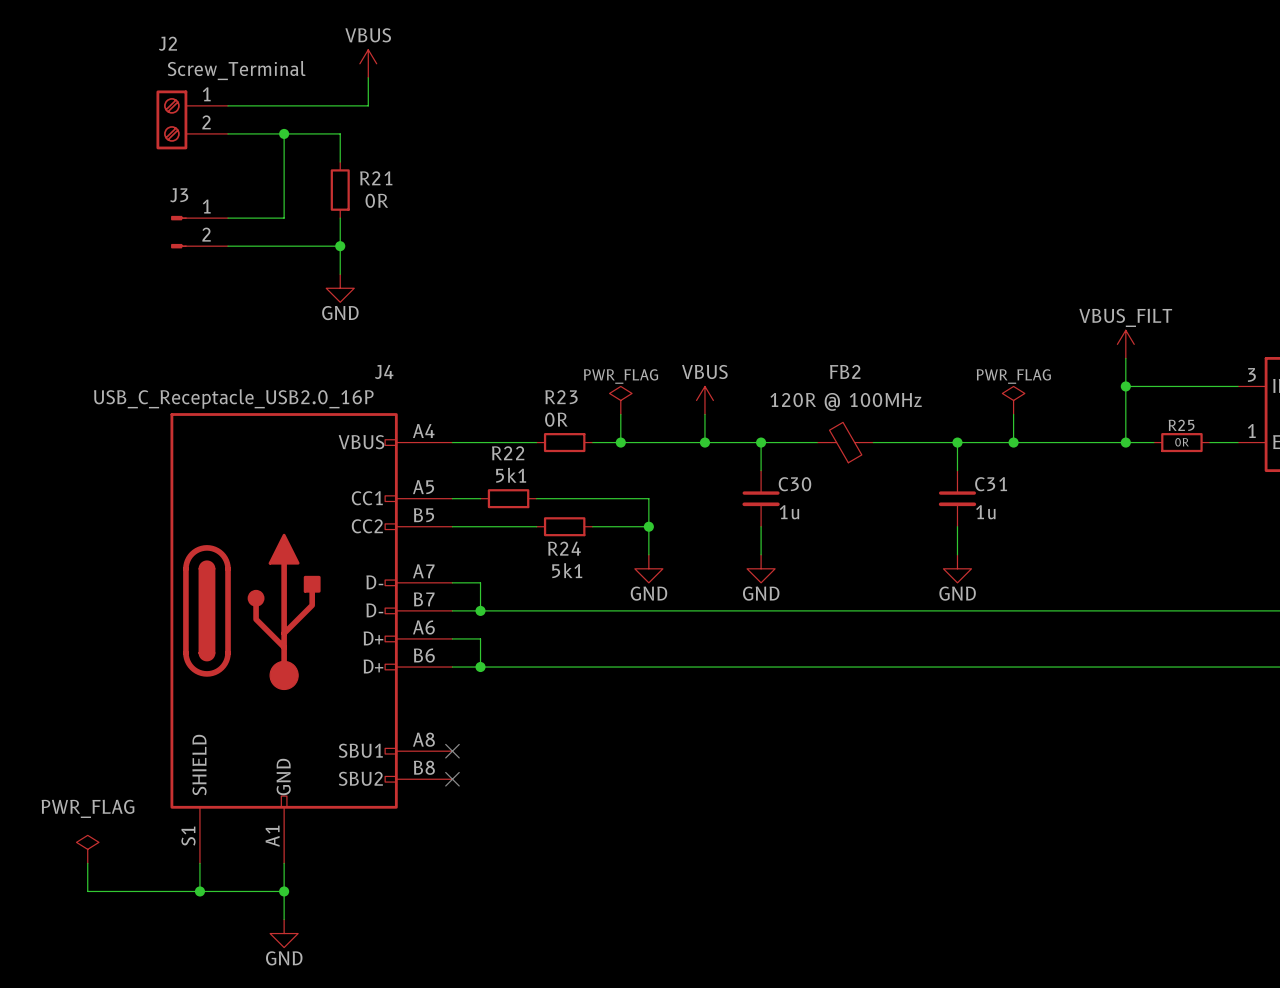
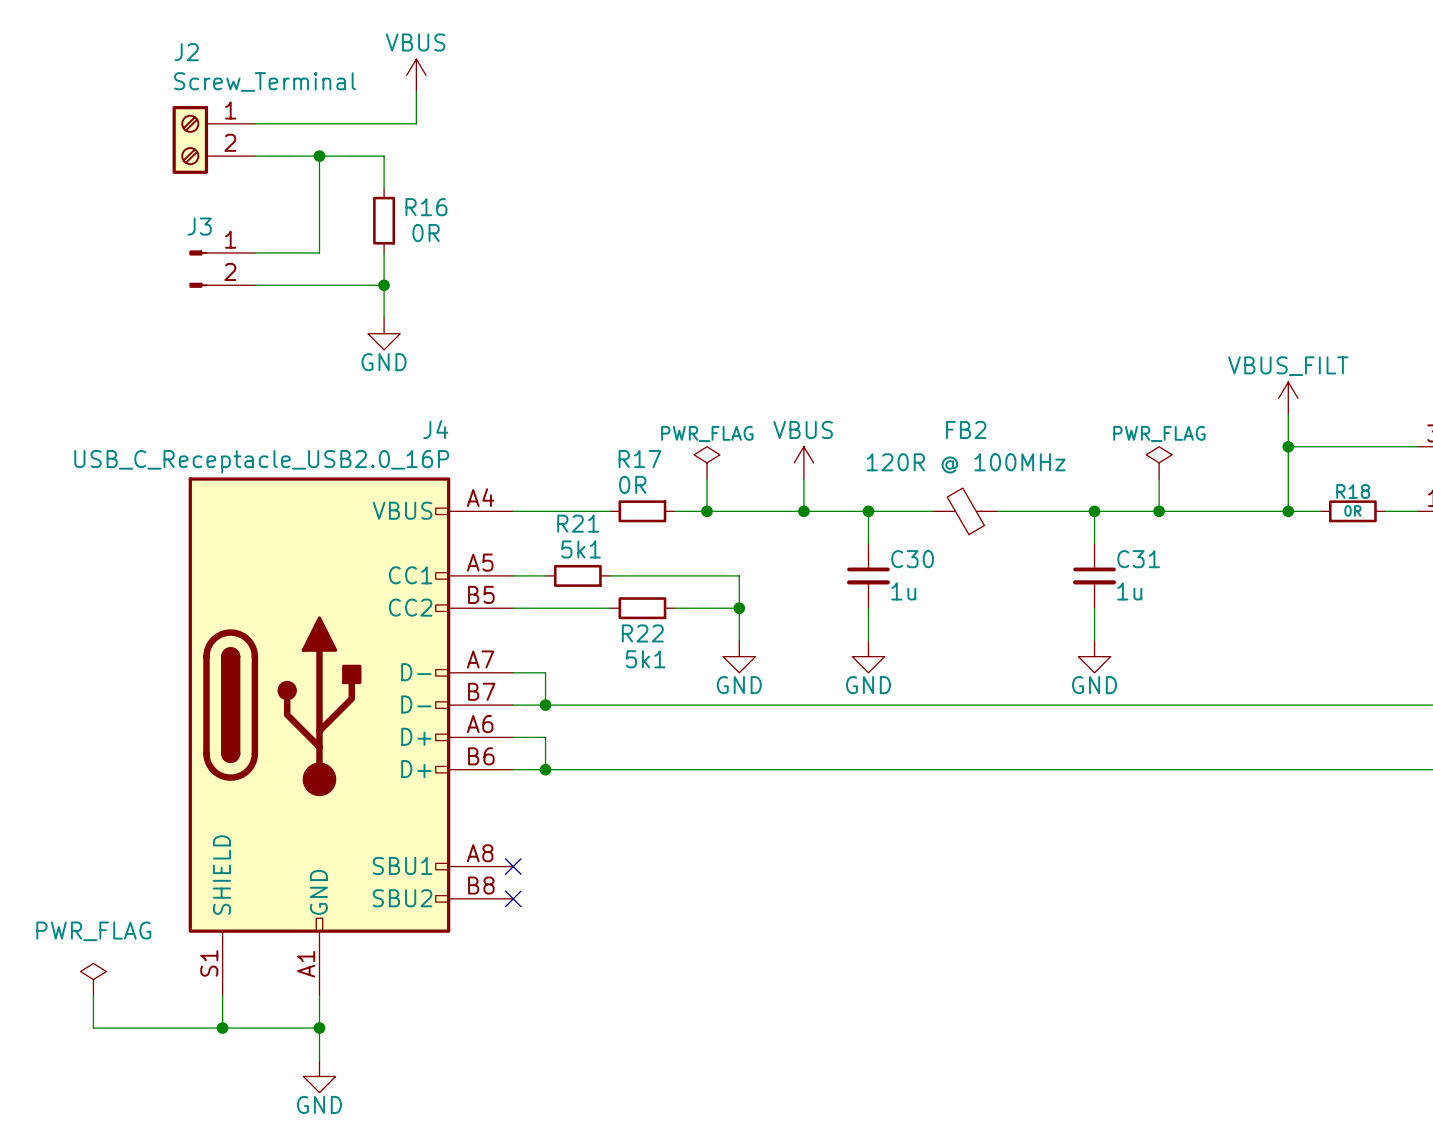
R21 name: R21 (376, 178) -> R16 (426, 207)
R23 name: R23 (561, 397) -> R17 (639, 459)
R25 name: R25 (1181, 425) -> R18 (1353, 491)
R22 name: R22 (508, 453) -> R21 (578, 523)
R24 name: R24 (564, 548) -> R22 (642, 633)

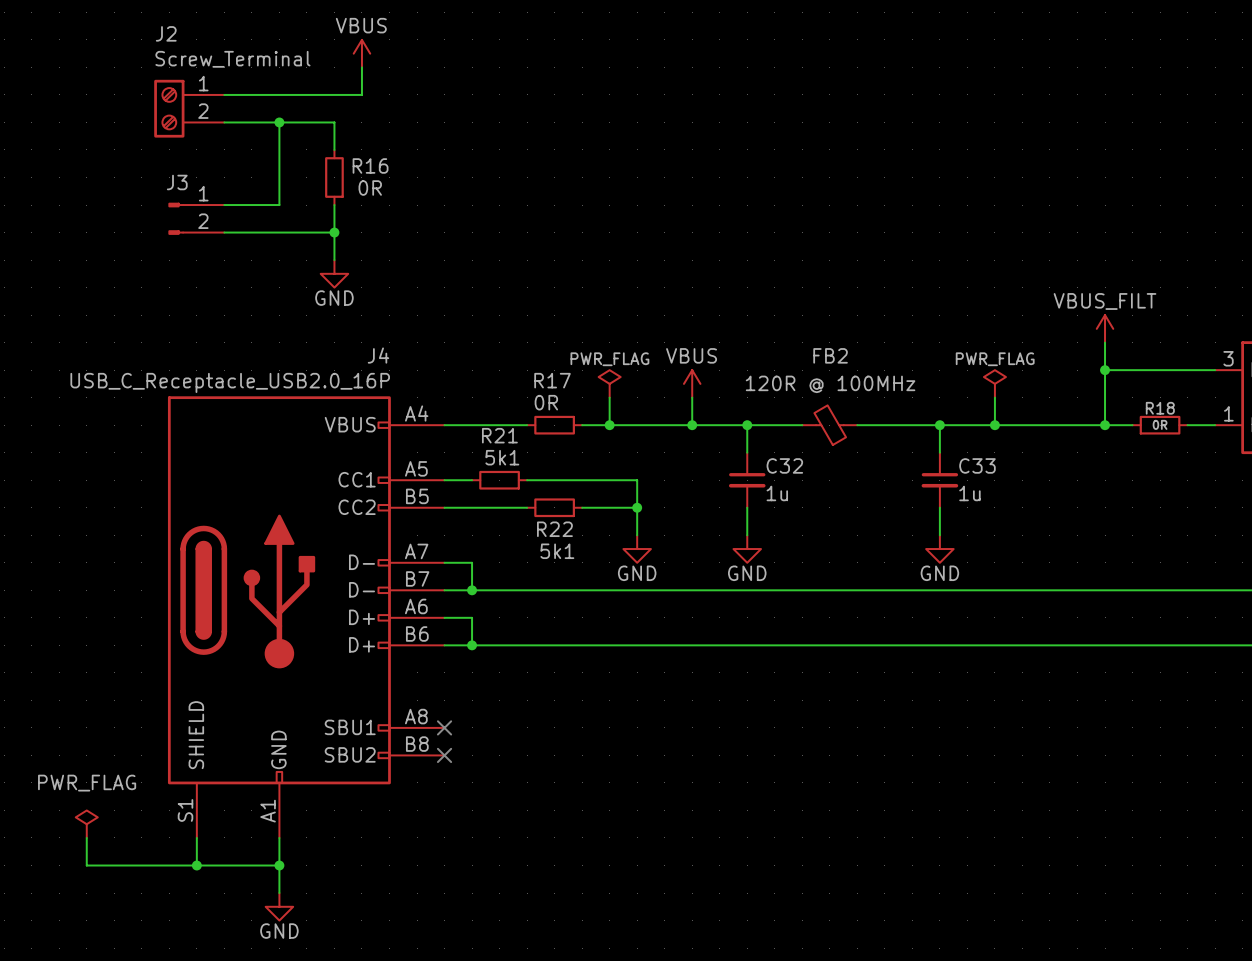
C30 name: C30 (912, 559) -> C32 (784, 465)
C31 name: C31 (1138, 559) -> C33 (977, 465)

